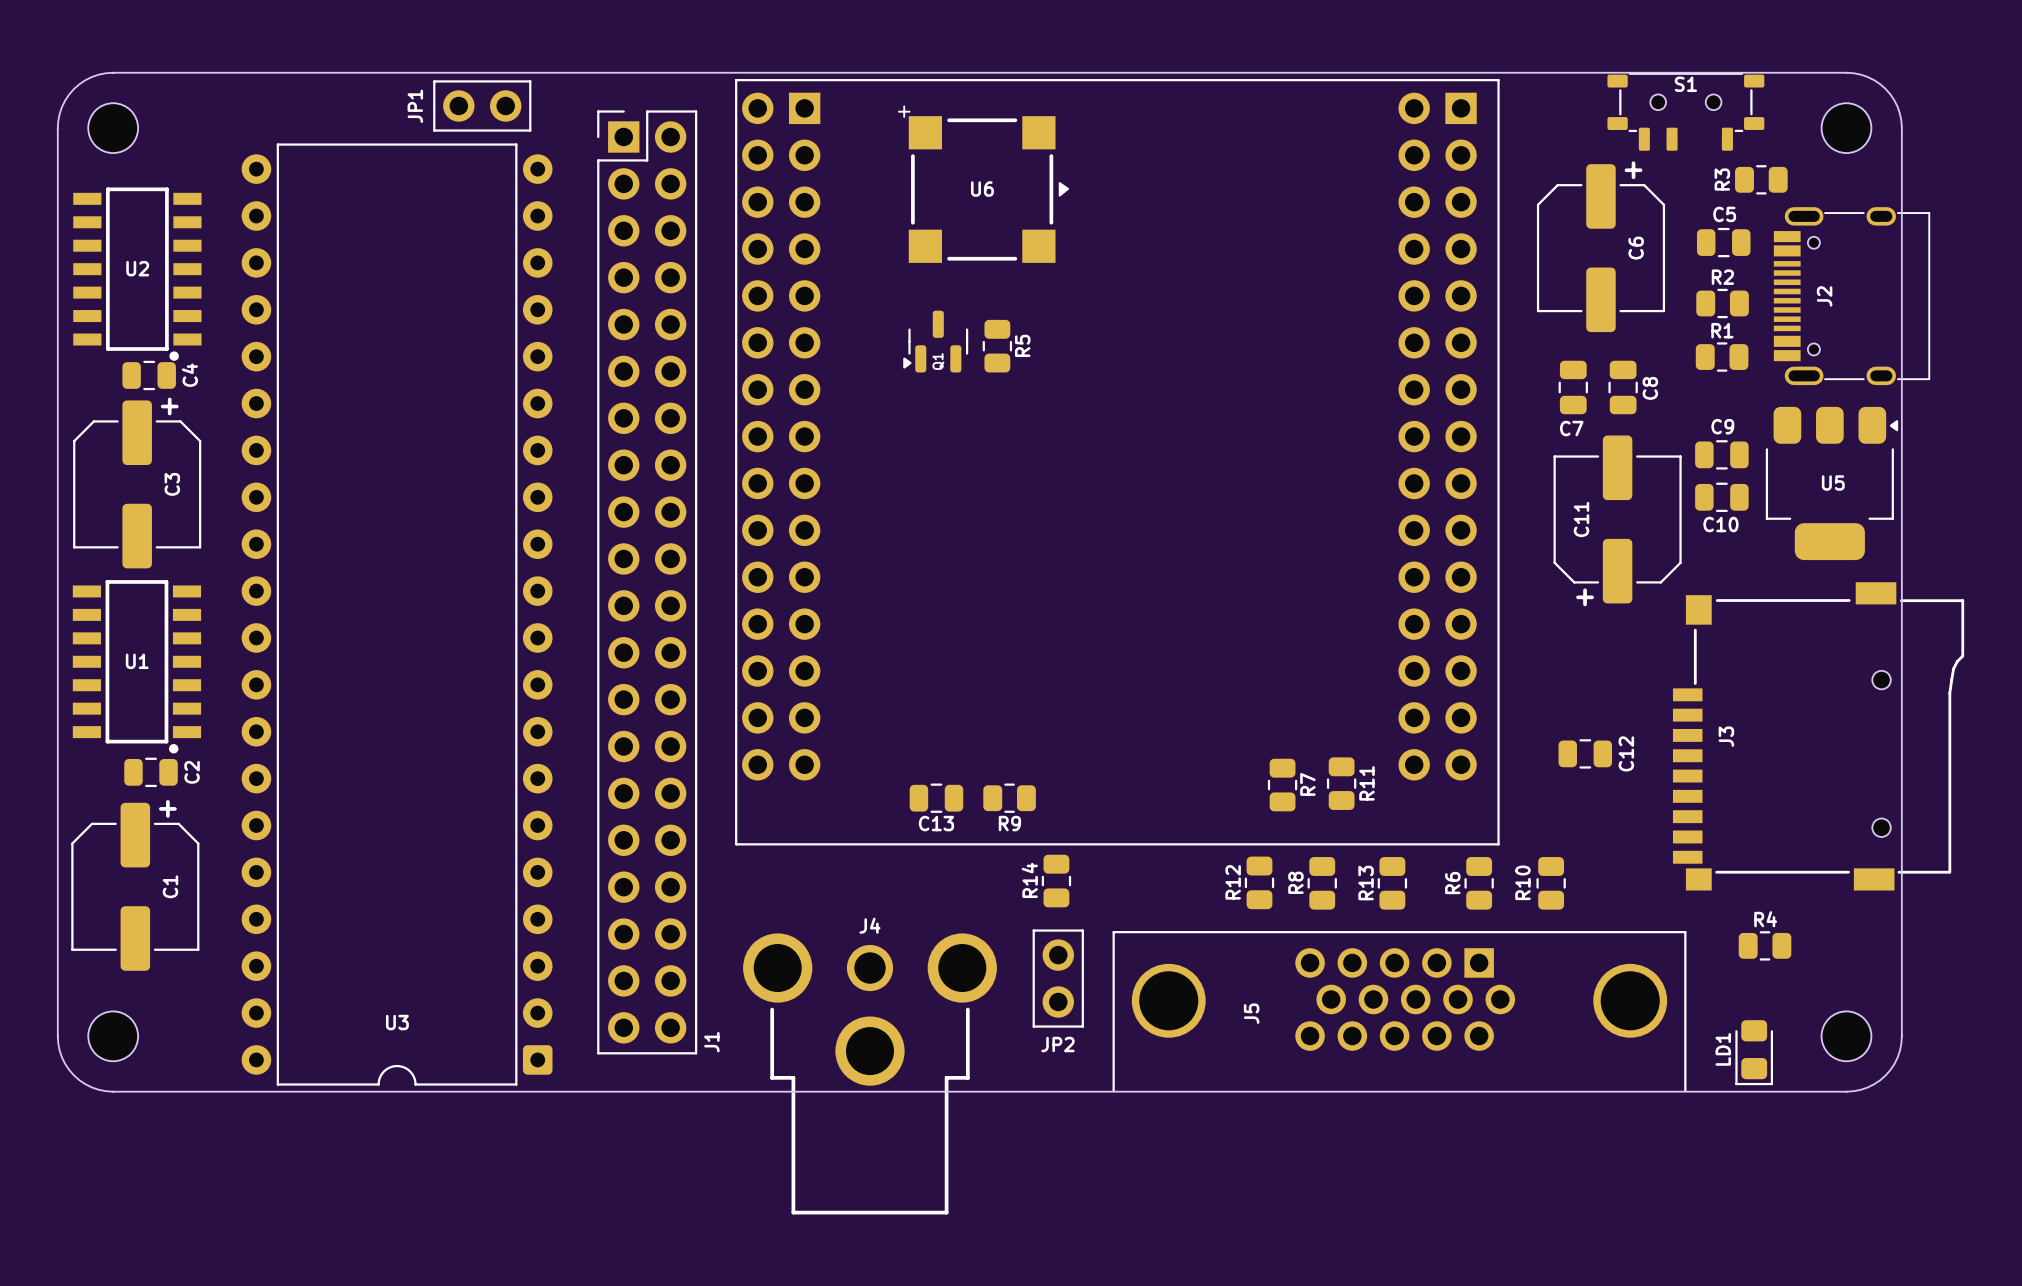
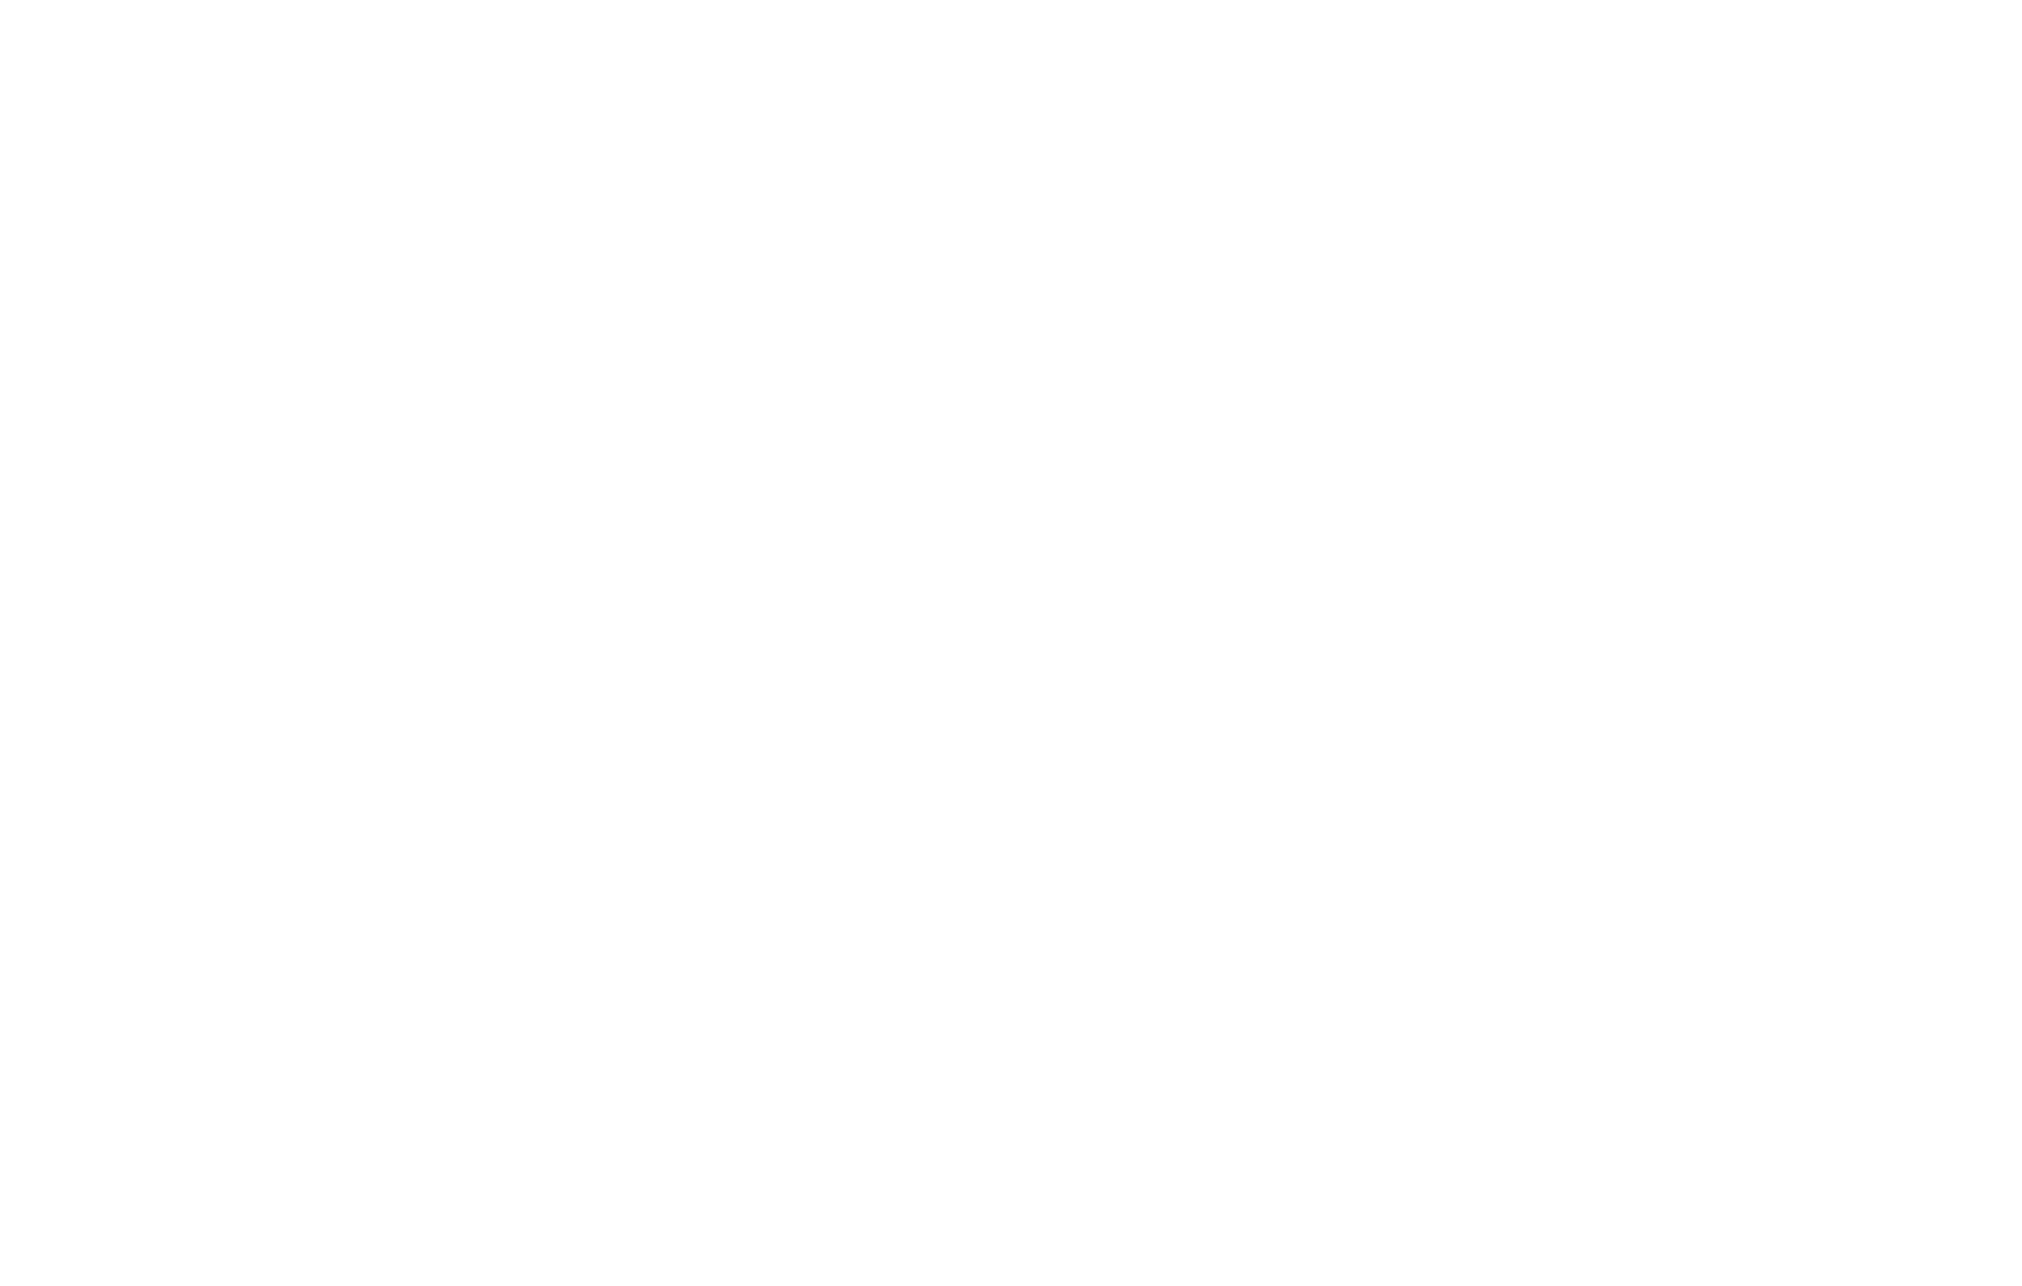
board edge: (113, 72) (1846, 72) (1860, 74) (1874, 80) (1885, 88) (1894, 100) (1899, 113) (1901, 128) (1901, 1036) (1899, 1050) (1894, 1064) (1885, 1075) (1874, 1084) (1860, 1089) (1846, 1091) (113, 1091) (98, 1089) (85, 1084) (74, 1075) (65, 1064) (59, 1050) (57, 1036) (57, 128) (62, 106) (74, 88) (91, 76) (113, 72) -> none
JP1: (482, 105) -> none
S1: (1685, 111) -> none
part: (113, 128) -> none
part: (1846, 128) -> none
R3: (1761, 179) -> none
U6: (983, 184) -> none
C5: (1723, 242) -> none
C6: (1600, 248) -> none
U2: (137, 274) -> none
J2: (1852, 296) -> none
R2: (1722, 303) -> none
Q1: (935, 341) -> none
R5: (997, 346) -> none
R1: (1722, 357) -> none
C4: (149, 375) -> none
C7: (1573, 387) -> none
C8: (1623, 387) -> none
C9: (1721, 454) -> none
part: (1117, 462) -> none
U5: (1831, 483) -> none
C3: (137, 484) -> none
C10: (1721, 497) -> none
C11: (1617, 519) -> none
J1: (647, 582) -> none
U3: (397, 614) -> none
U1: (136, 666) -> none
J3: (1818, 736) -> none
C12: (1585, 753) -> none
C2: (151, 772) -> none
R11: (1341, 783) -> none
R7: (1282, 785) -> none
C13: (936, 798) -> none
R9: (1009, 798) -> none
R14: (1056, 881) -> none
R12: (1259, 882) -> none
R8: (1322, 883) -> none
R13: (1392, 883) -> none
R6: (1479, 883) -> none
R10: (1551, 883) -> none
C1: (135, 886) -> none
R4: (1765, 945) -> none
JP2: (1058, 978) -> none
J5: (1399, 1011) -> none
part: (113, 1036) -> none
part: (1846, 1036) -> none
LD1: (1754, 1052) -> none
J4: (870, 1073) -> none

